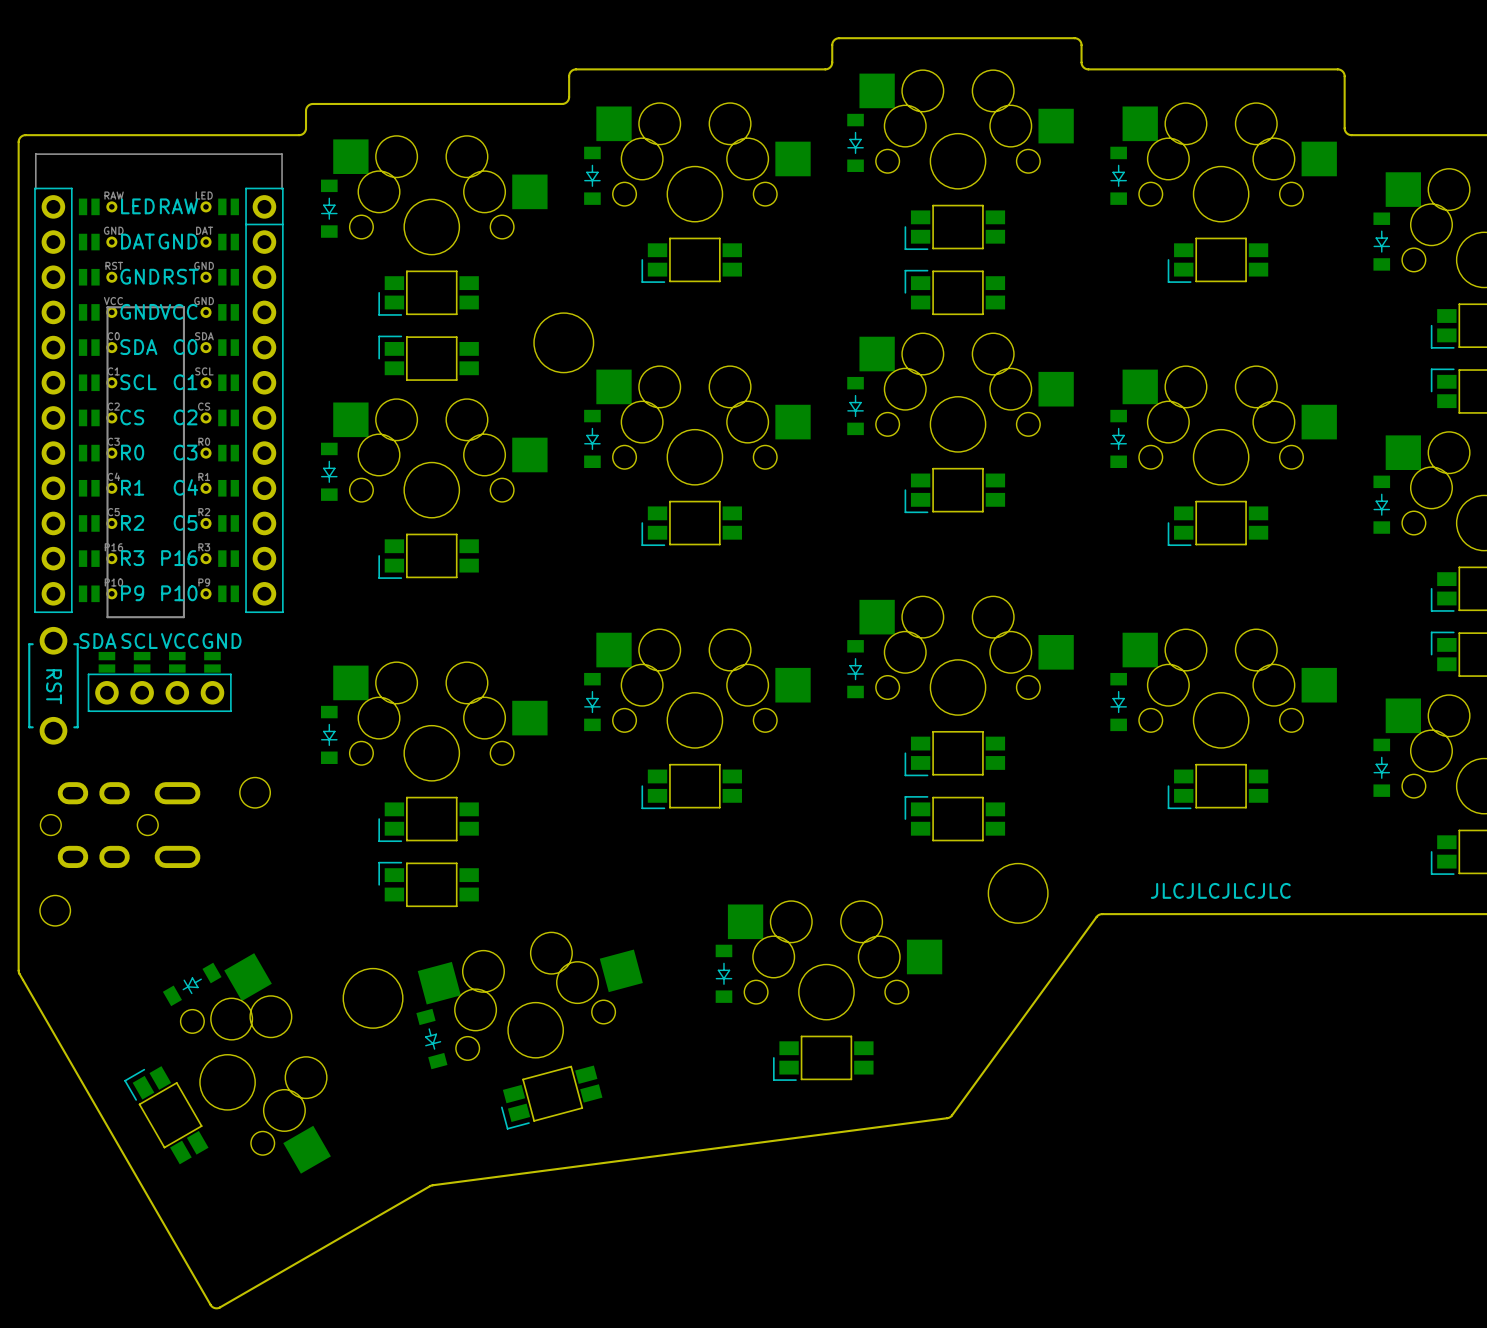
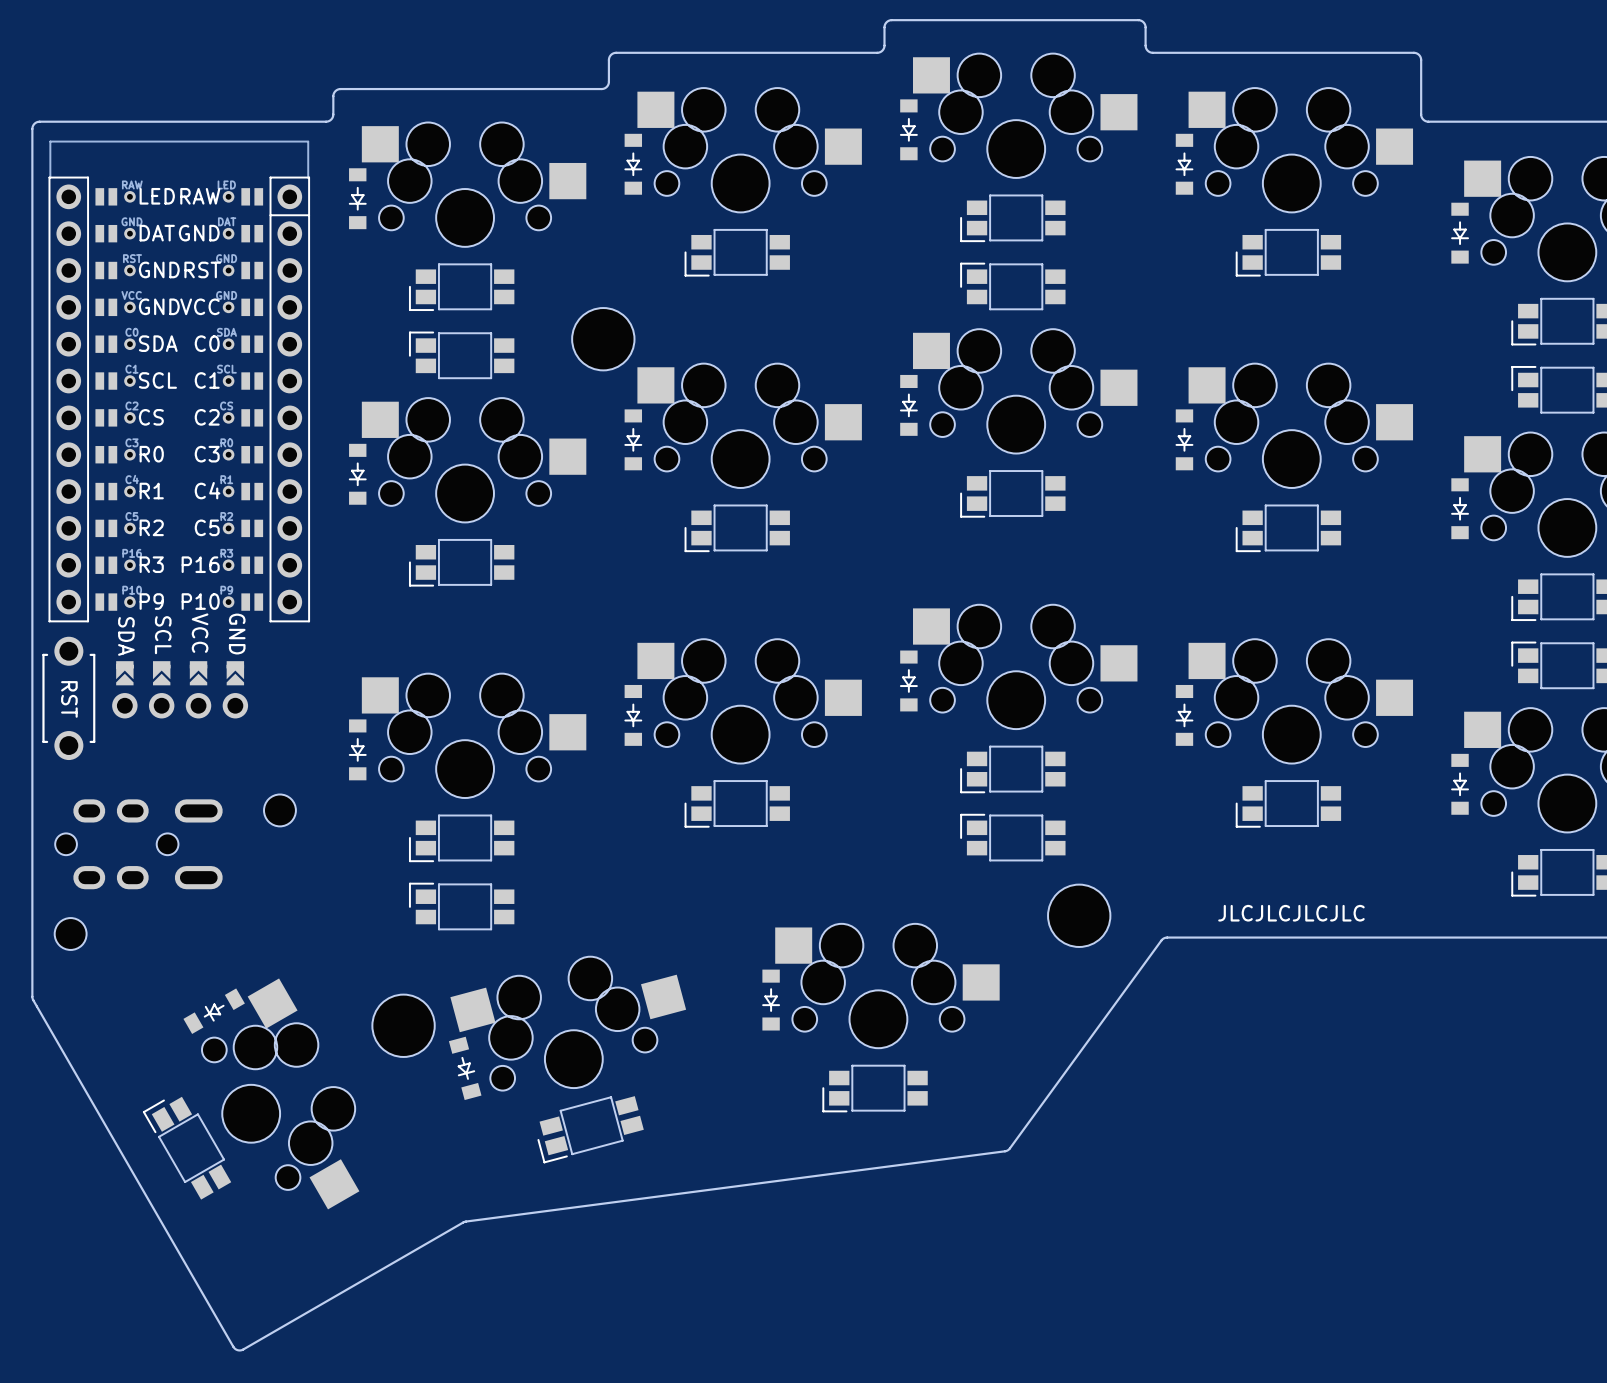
part: (159, 509) -> none
part: none -> (180, 689)

